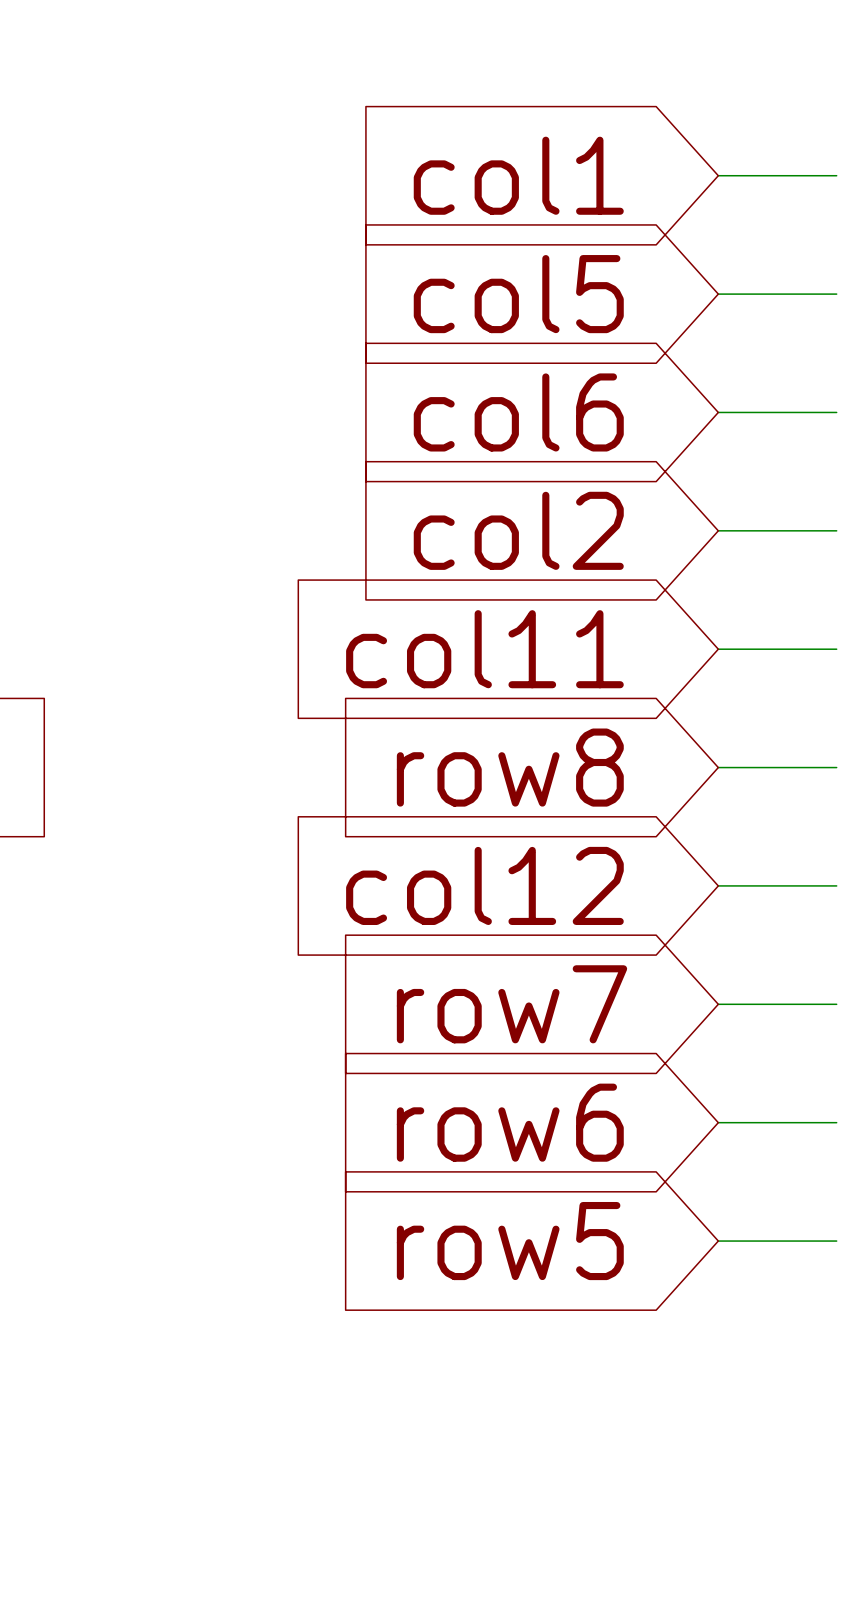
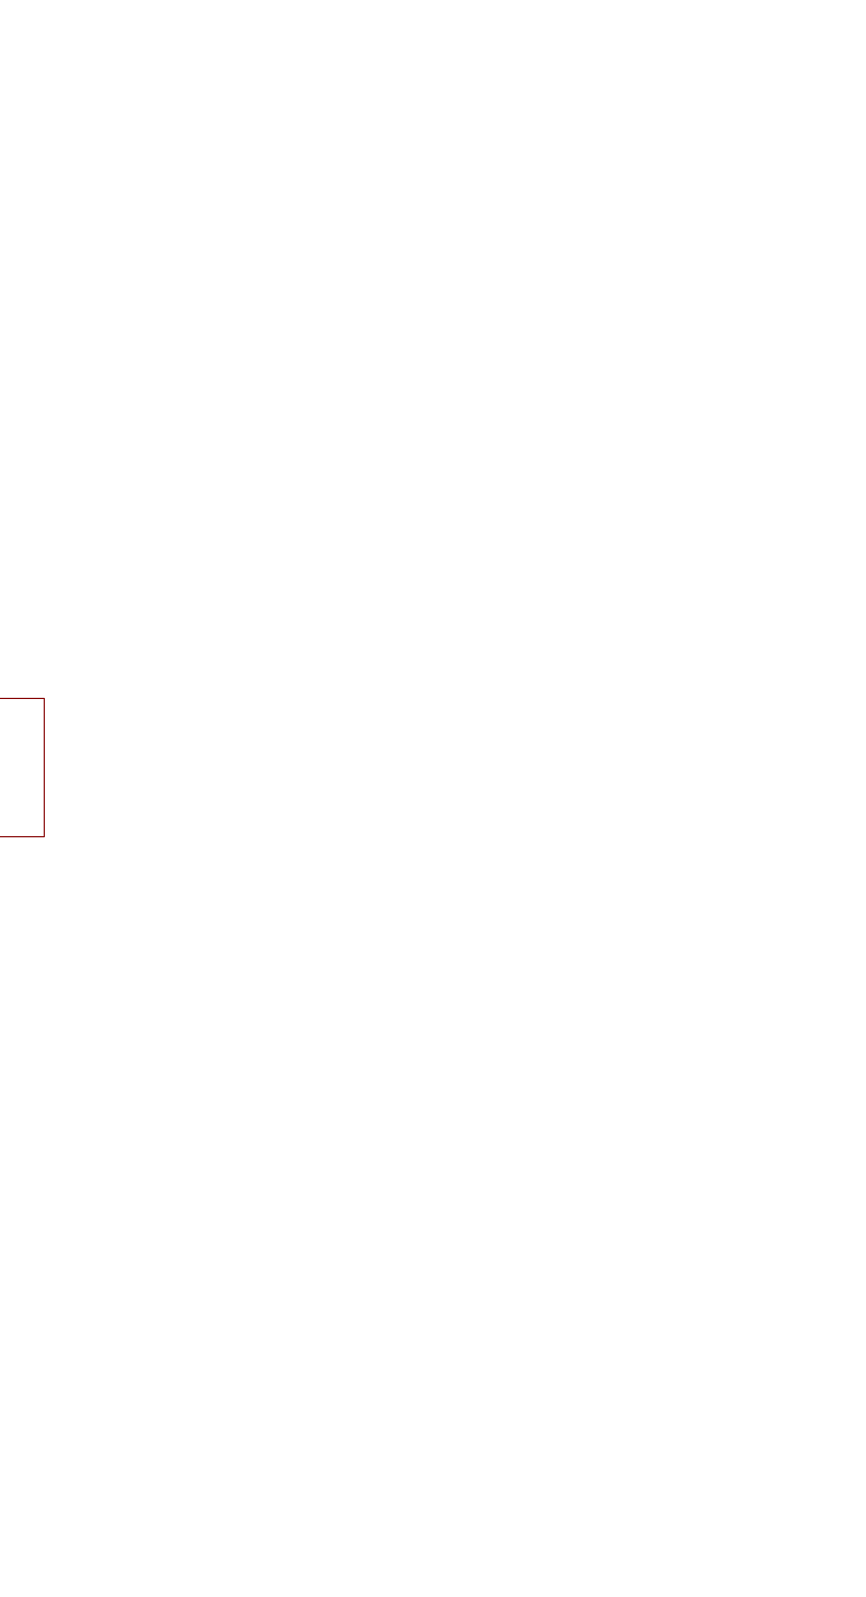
global label: col1 (518, 175) -> none
wire: (718, 175) (836, 175) -> none
global label: col5 (518, 294) -> none
wire: (718, 294) (836, 294) -> none
global label: col6 (518, 412) -> none
wire: (718, 412) (836, 412) -> none
global label: col2 (518, 530) -> none
wire: (718, 530) (836, 530) -> none
global label: col11 (484, 649) -> none
wire: (718, 649) (836, 649) -> none
global label: row8 (510, 767) -> none
wire: (718, 767) (836, 767) -> none
global label: col12 (484, 885) -> none
wire: (718, 885) (836, 885) -> none
global label: row7 (511, 1004) -> none
wire: (718, 1004) (836, 1004) -> none
global label: row6 (510, 1122) -> none
wire: (718, 1122) (836, 1122) -> none
global label: row5 (510, 1241) -> none
wire: (718, 1241) (836, 1241) -> none

